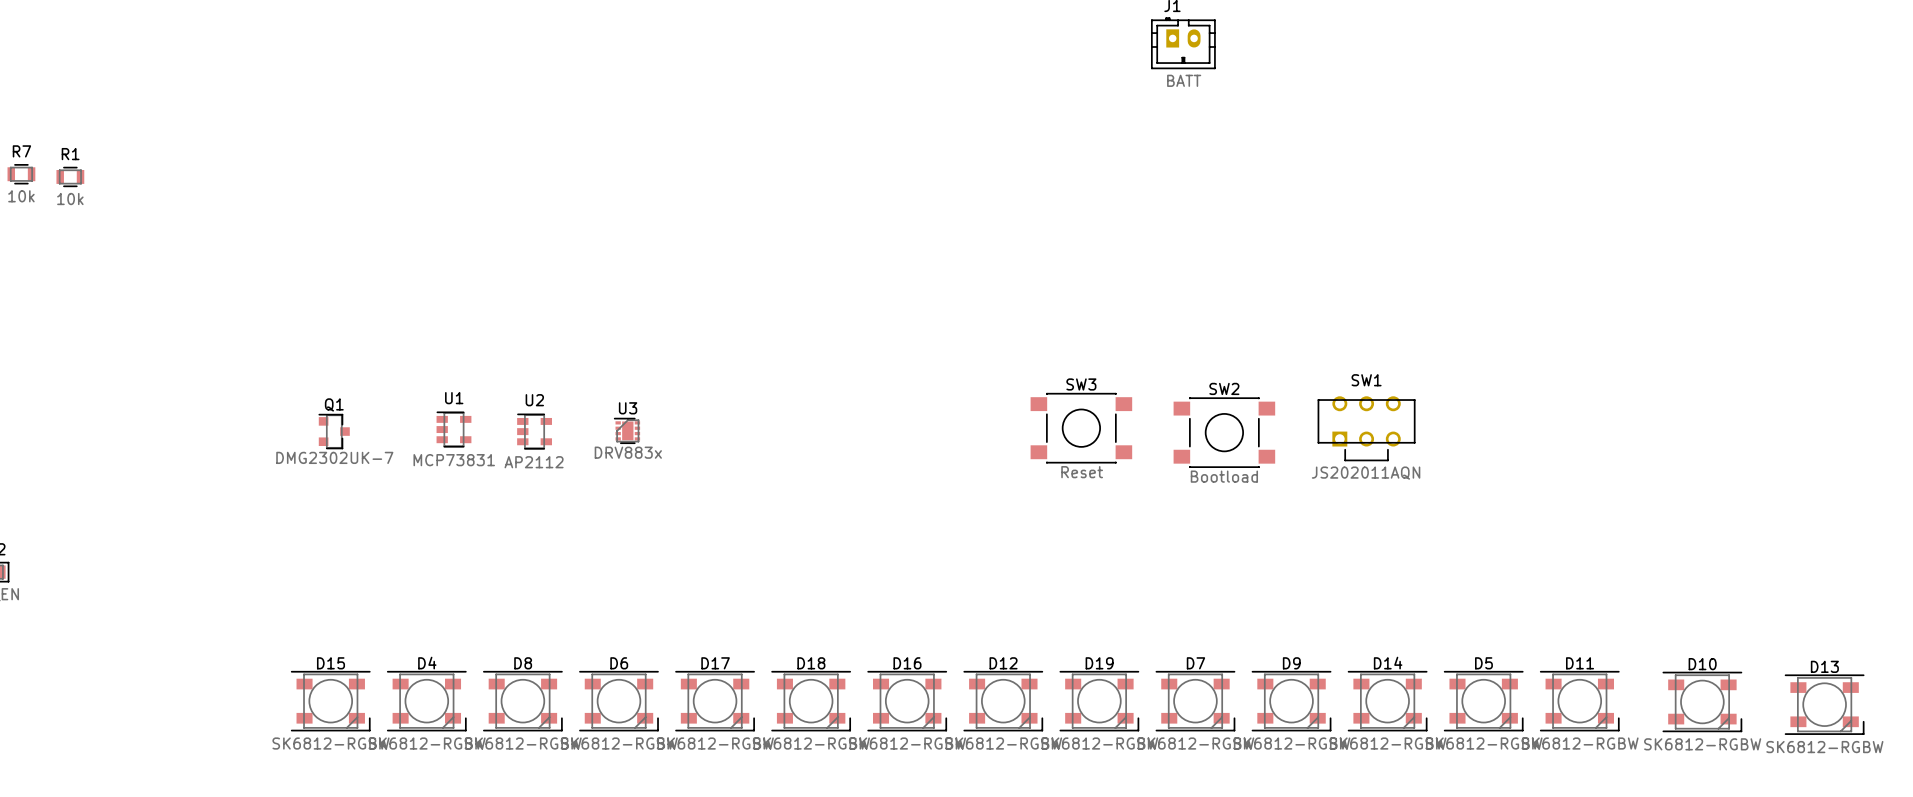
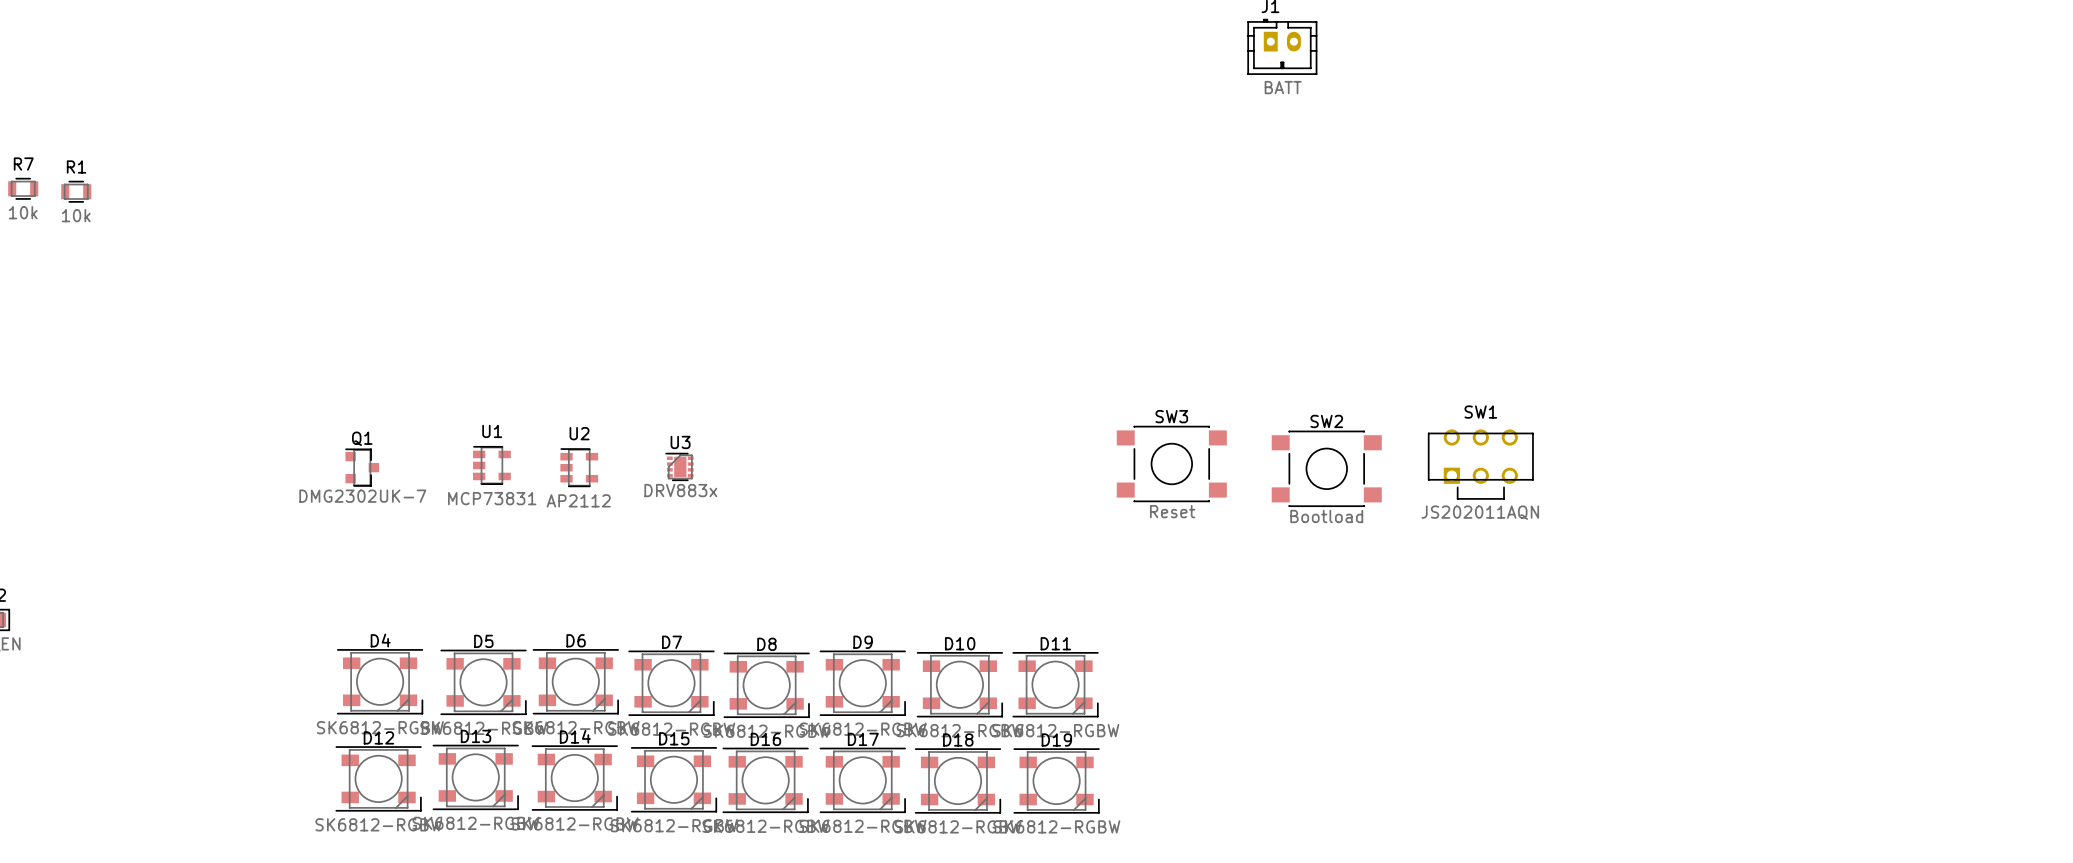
D15 position: (330, 701) -> (673, 779)
D4 position: (426, 701) -> (380, 681)
D8 position: (522, 701) -> (766, 685)
D6 position: (618, 701) -> (575, 681)
D17 position: (715, 701) -> (862, 780)
D18 position: (811, 701) -> (957, 780)
D16 position: (907, 701) -> (765, 780)
D12 position: (1003, 701) -> (378, 778)
D19 position: (1099, 701) -> (1056, 780)
D7 position: (1195, 701) -> (671, 683)
D9 position: (1291, 701) -> (862, 683)
D14 position: (1387, 701) -> (574, 778)
D5 position: (1483, 701) -> (483, 682)
D11 position: (1579, 701) -> (1055, 684)
D10 position: (1702, 701) -> (959, 684)
D13 position: (1824, 704) -> (475, 777)

